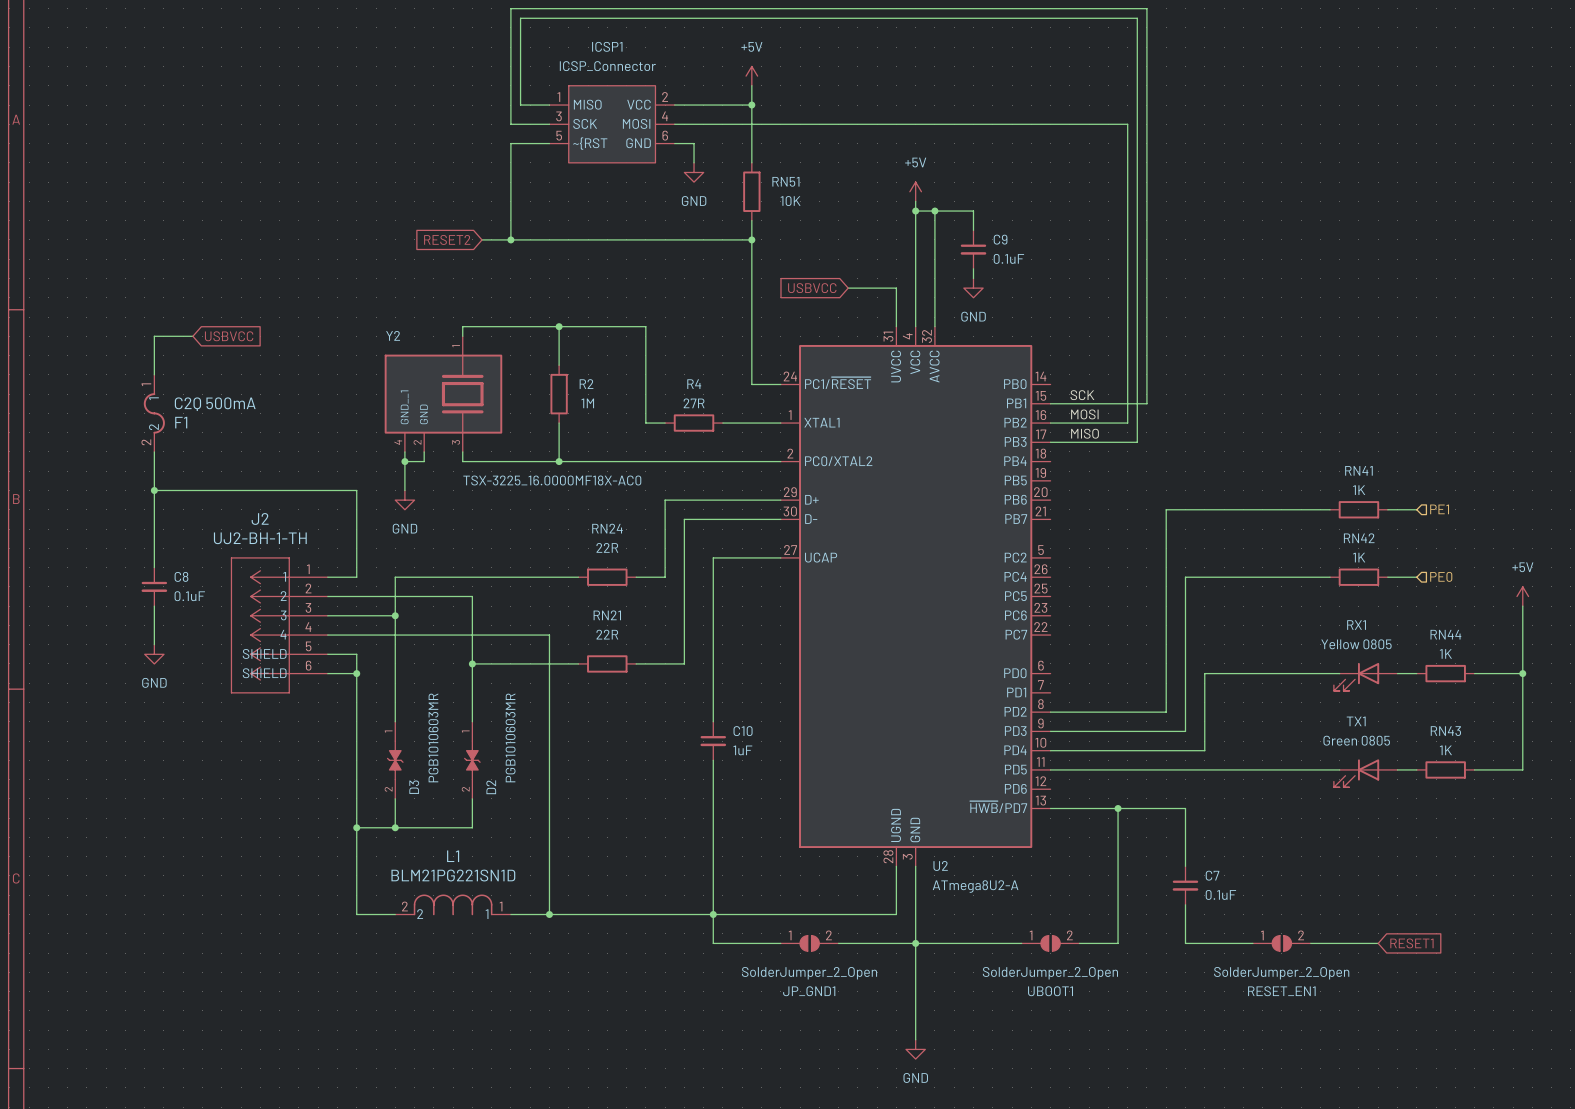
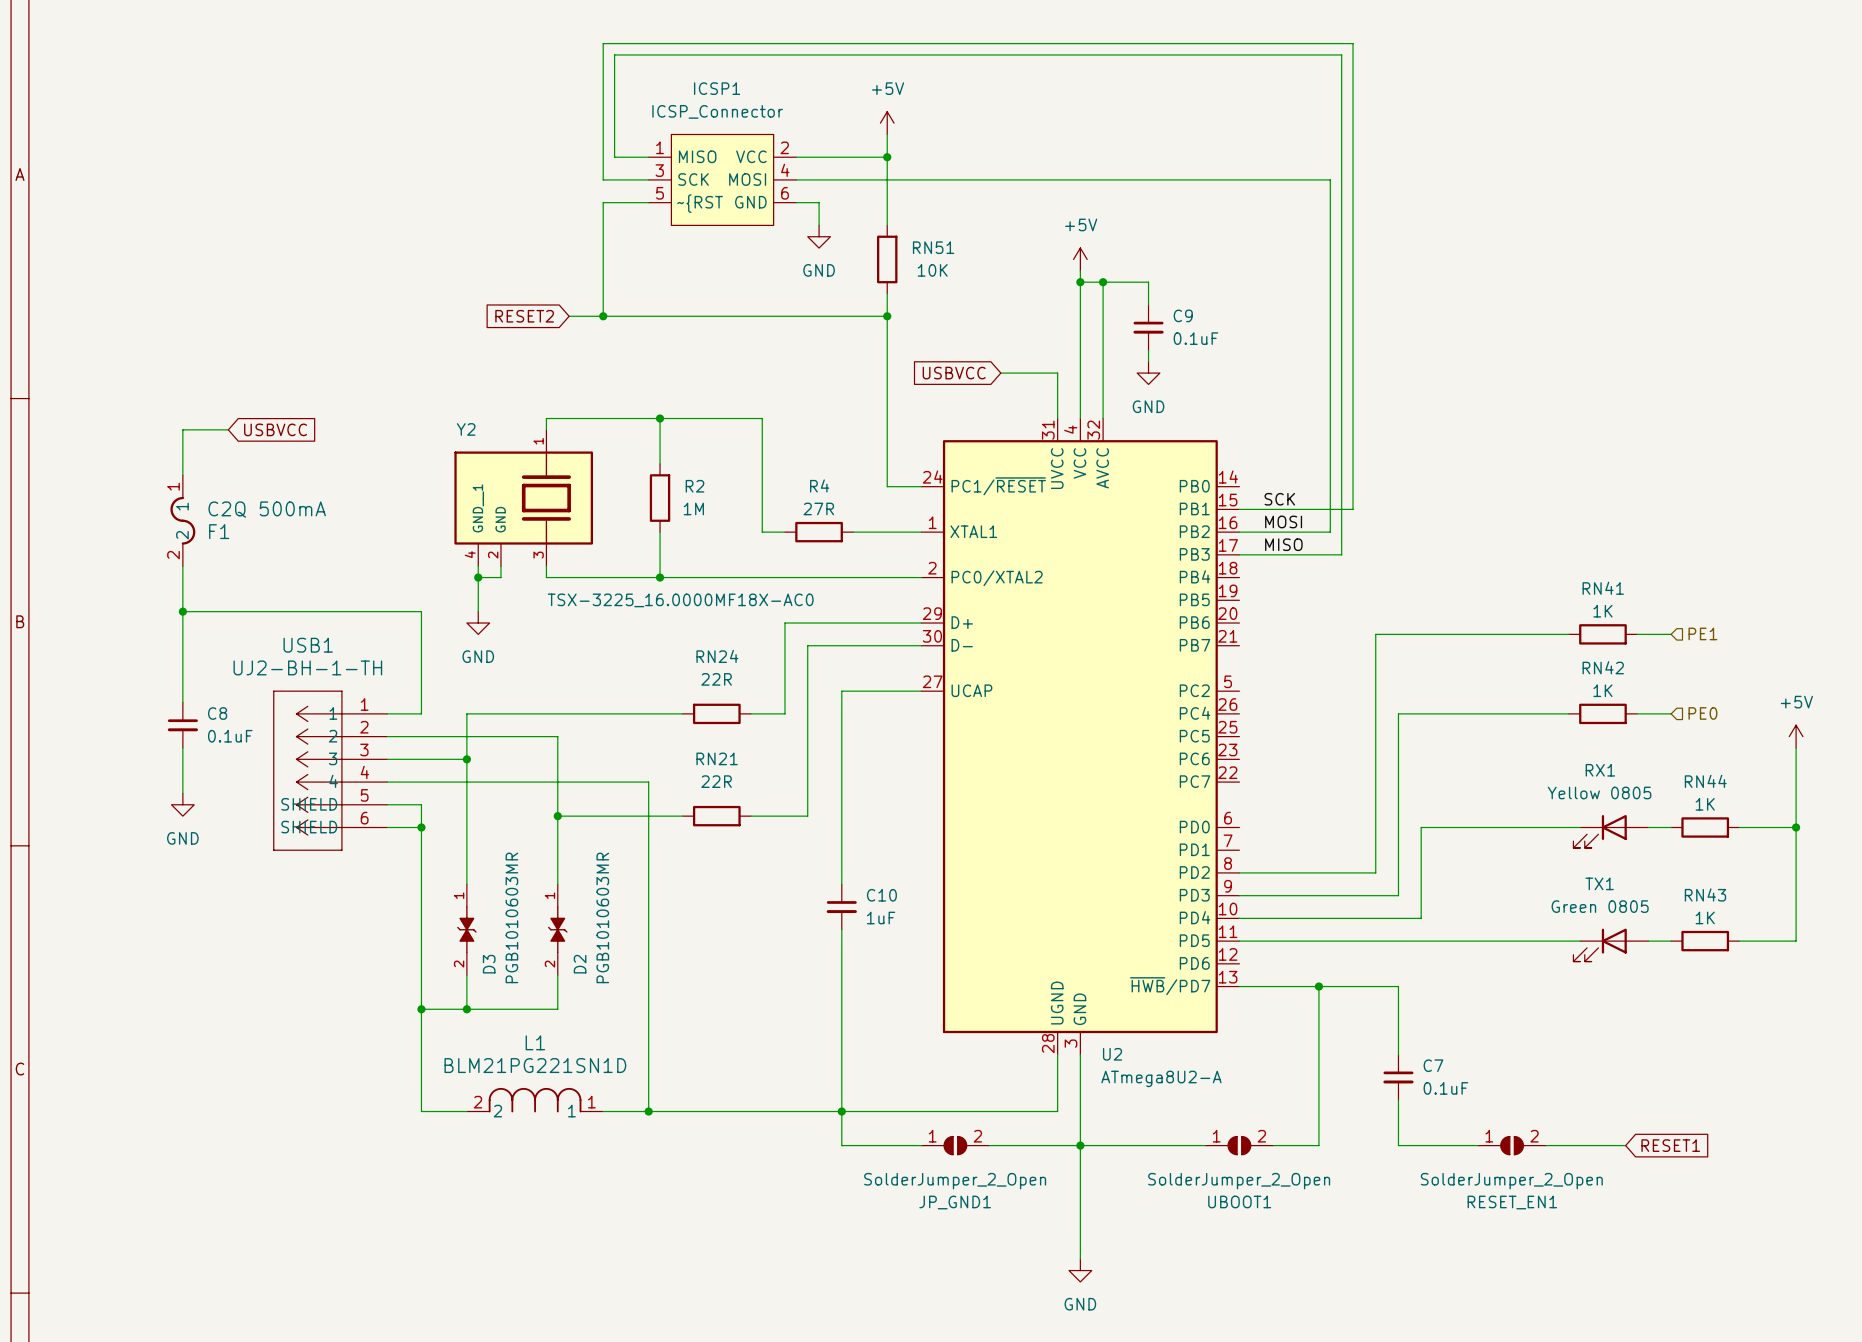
J2 name: J2 (260, 518) -> USB1 (308, 645)

